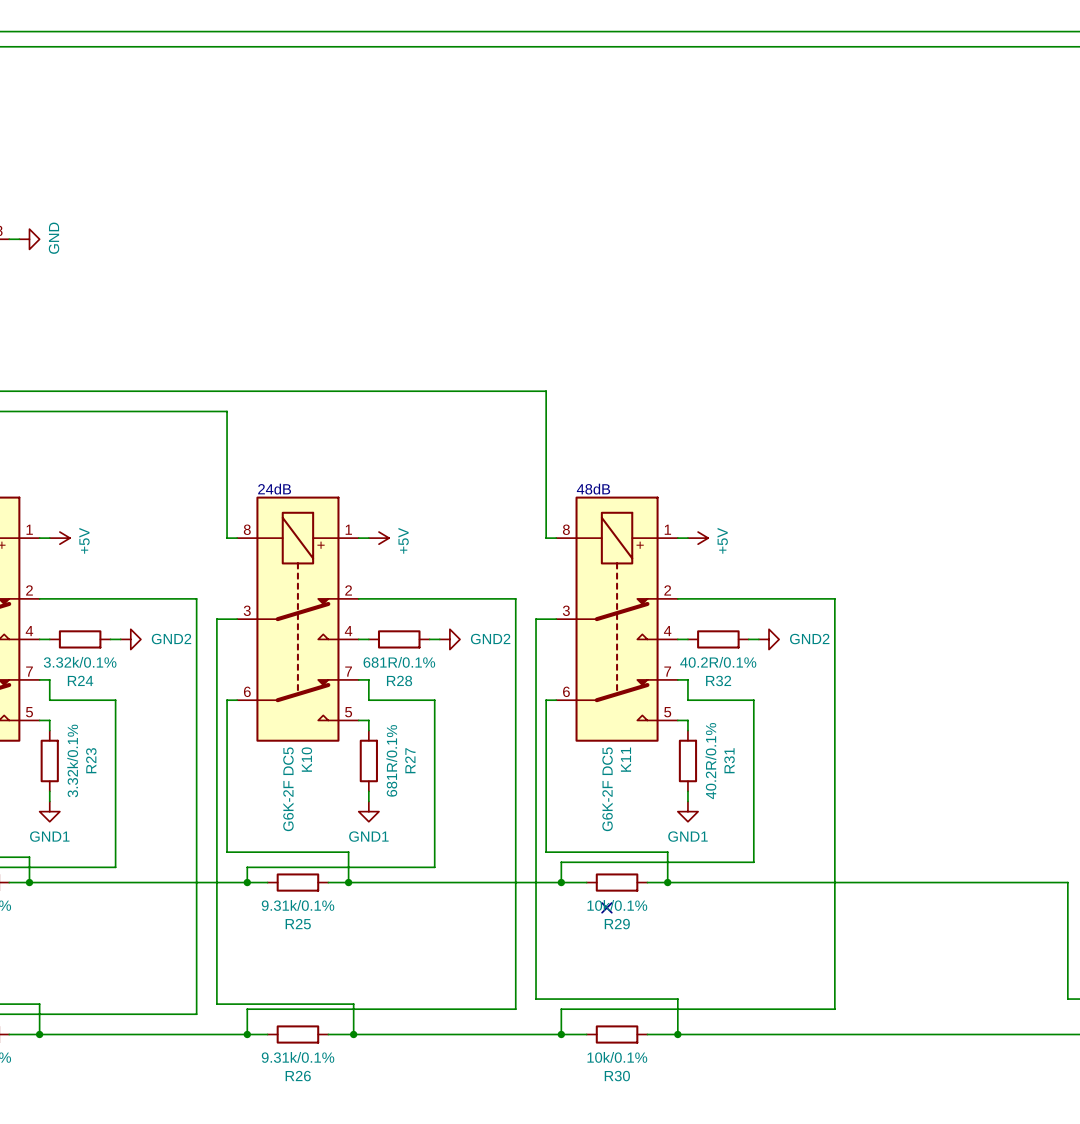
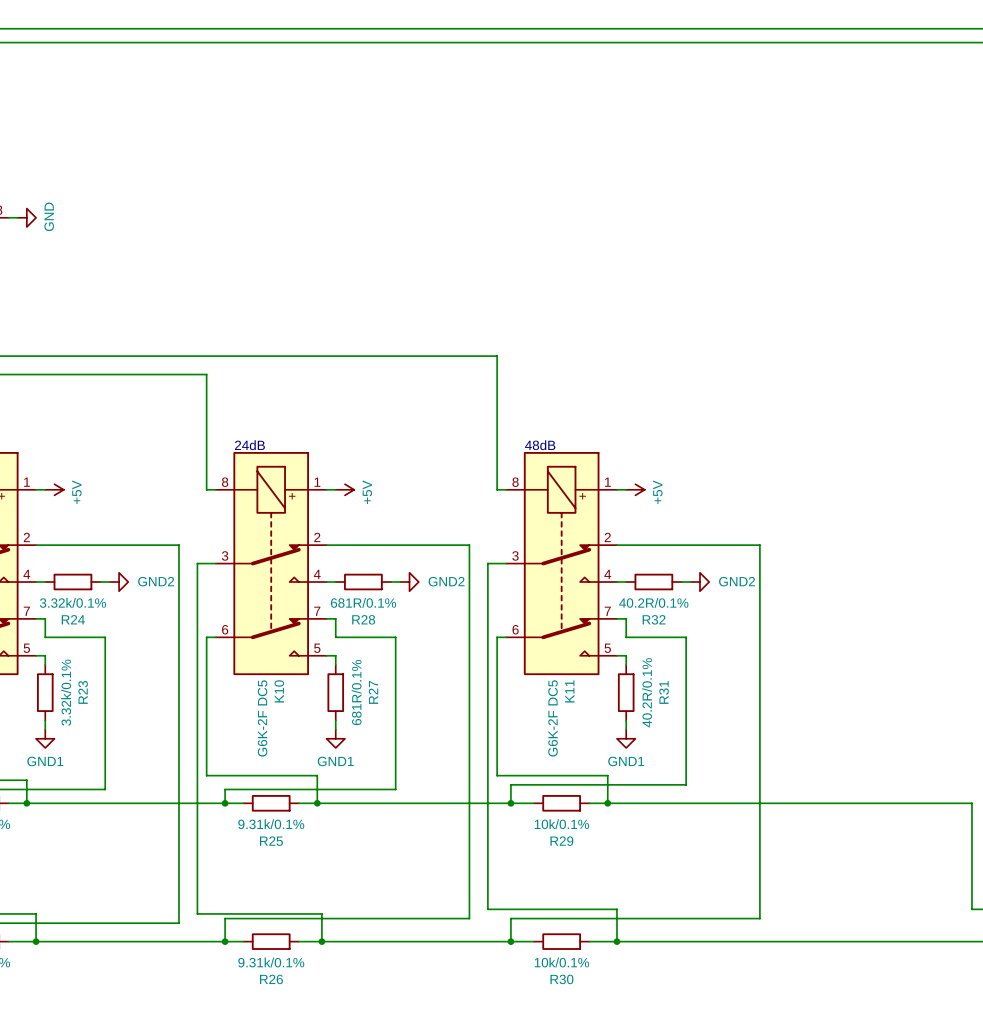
no-connect mark: (606, 907) -> none

